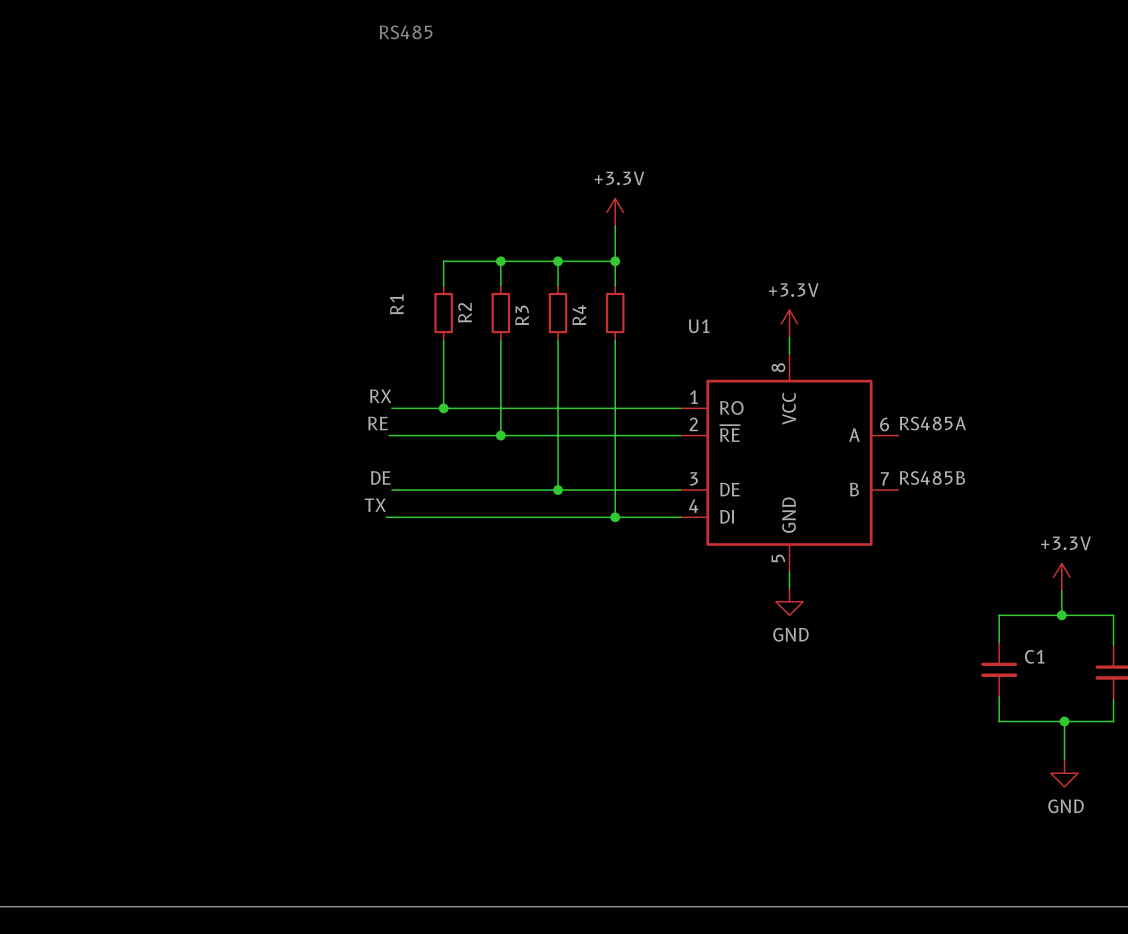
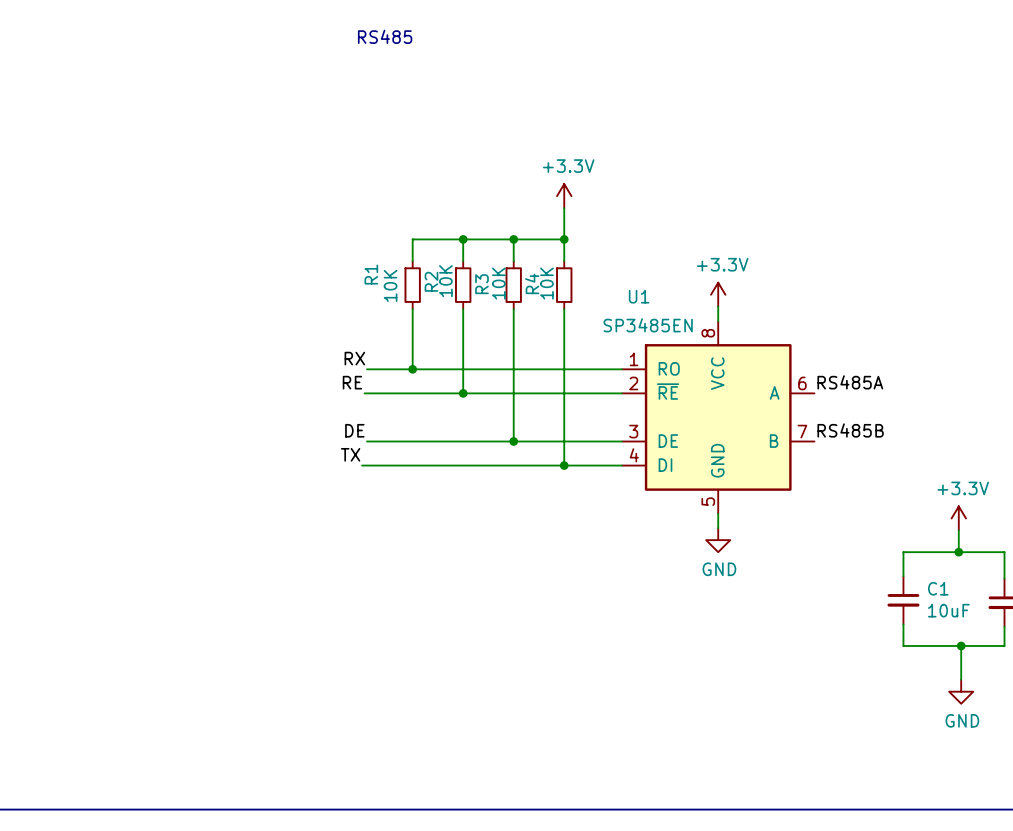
R2 value: none -> 10K (445, 281)
R3 value: none -> 10K (498, 283)
R4 value: none -> 10K (546, 283)
R1 value: none -> 10K (390, 285)
U1 value: none -> SP3485EN (648, 325)
C1 value: none -> 10uF (948, 610)

